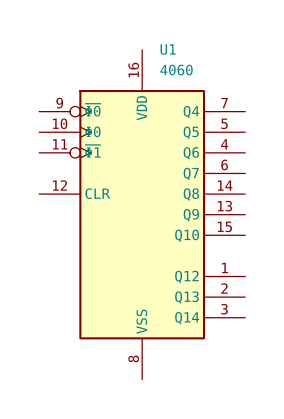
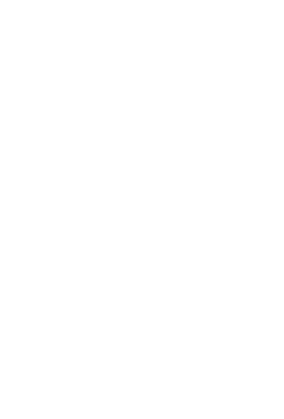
U1: 4060 (142, 214) -> none

